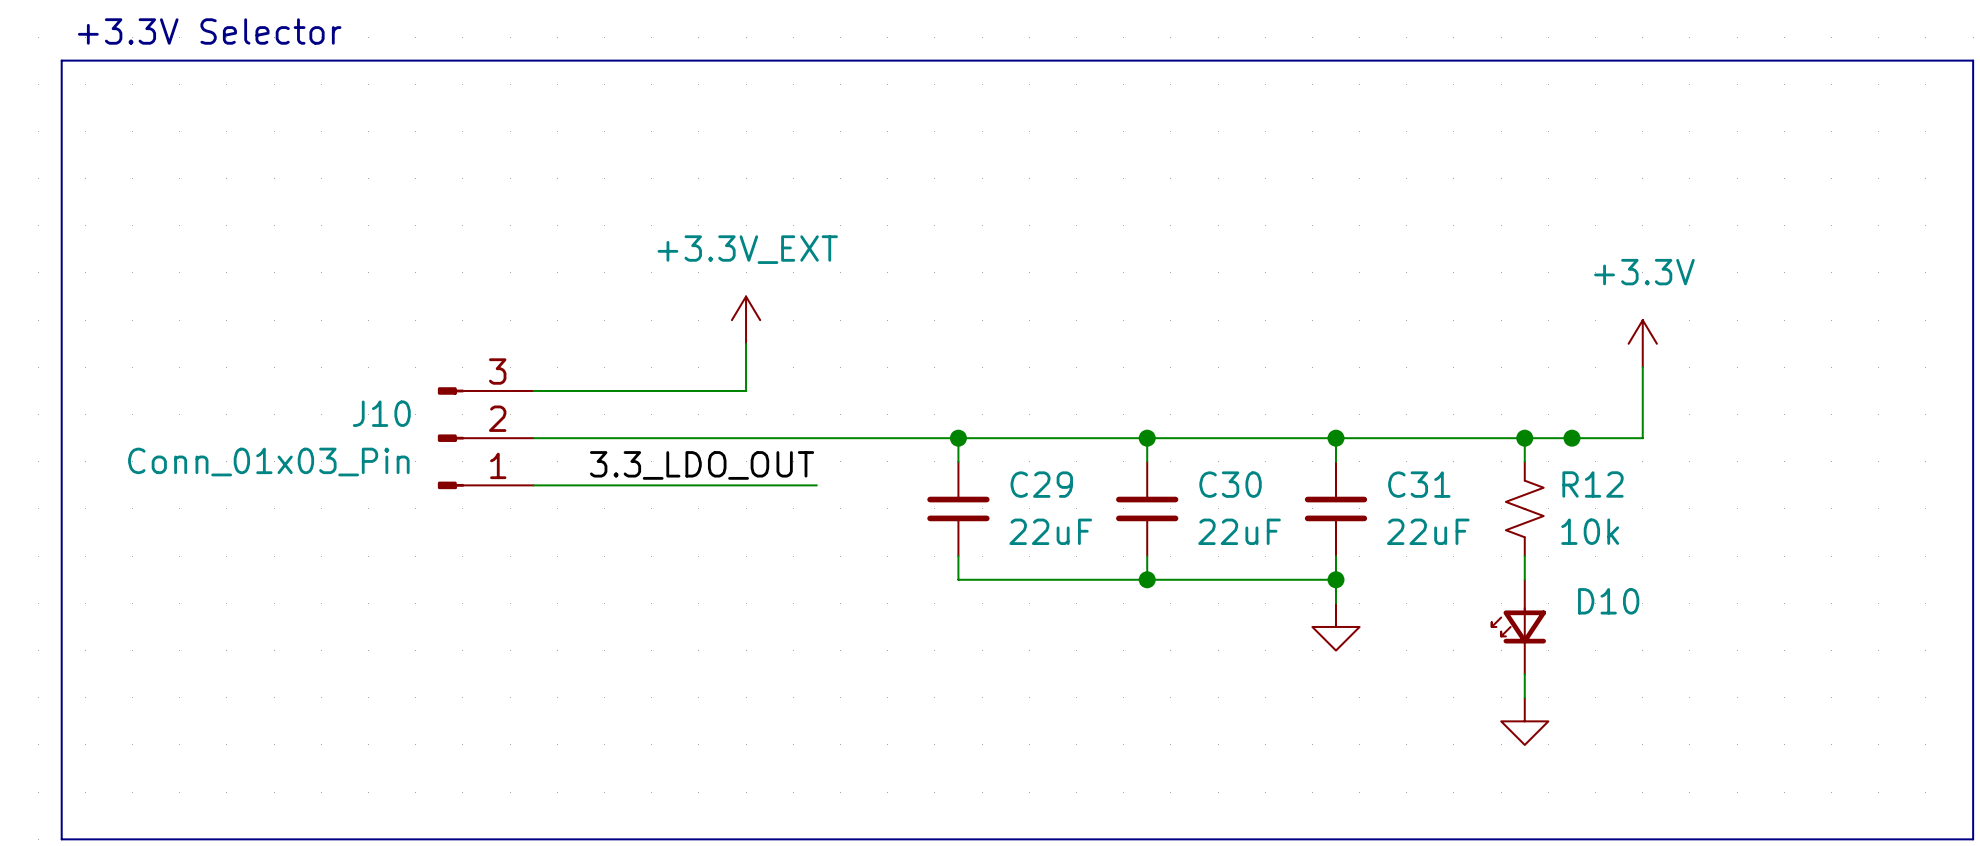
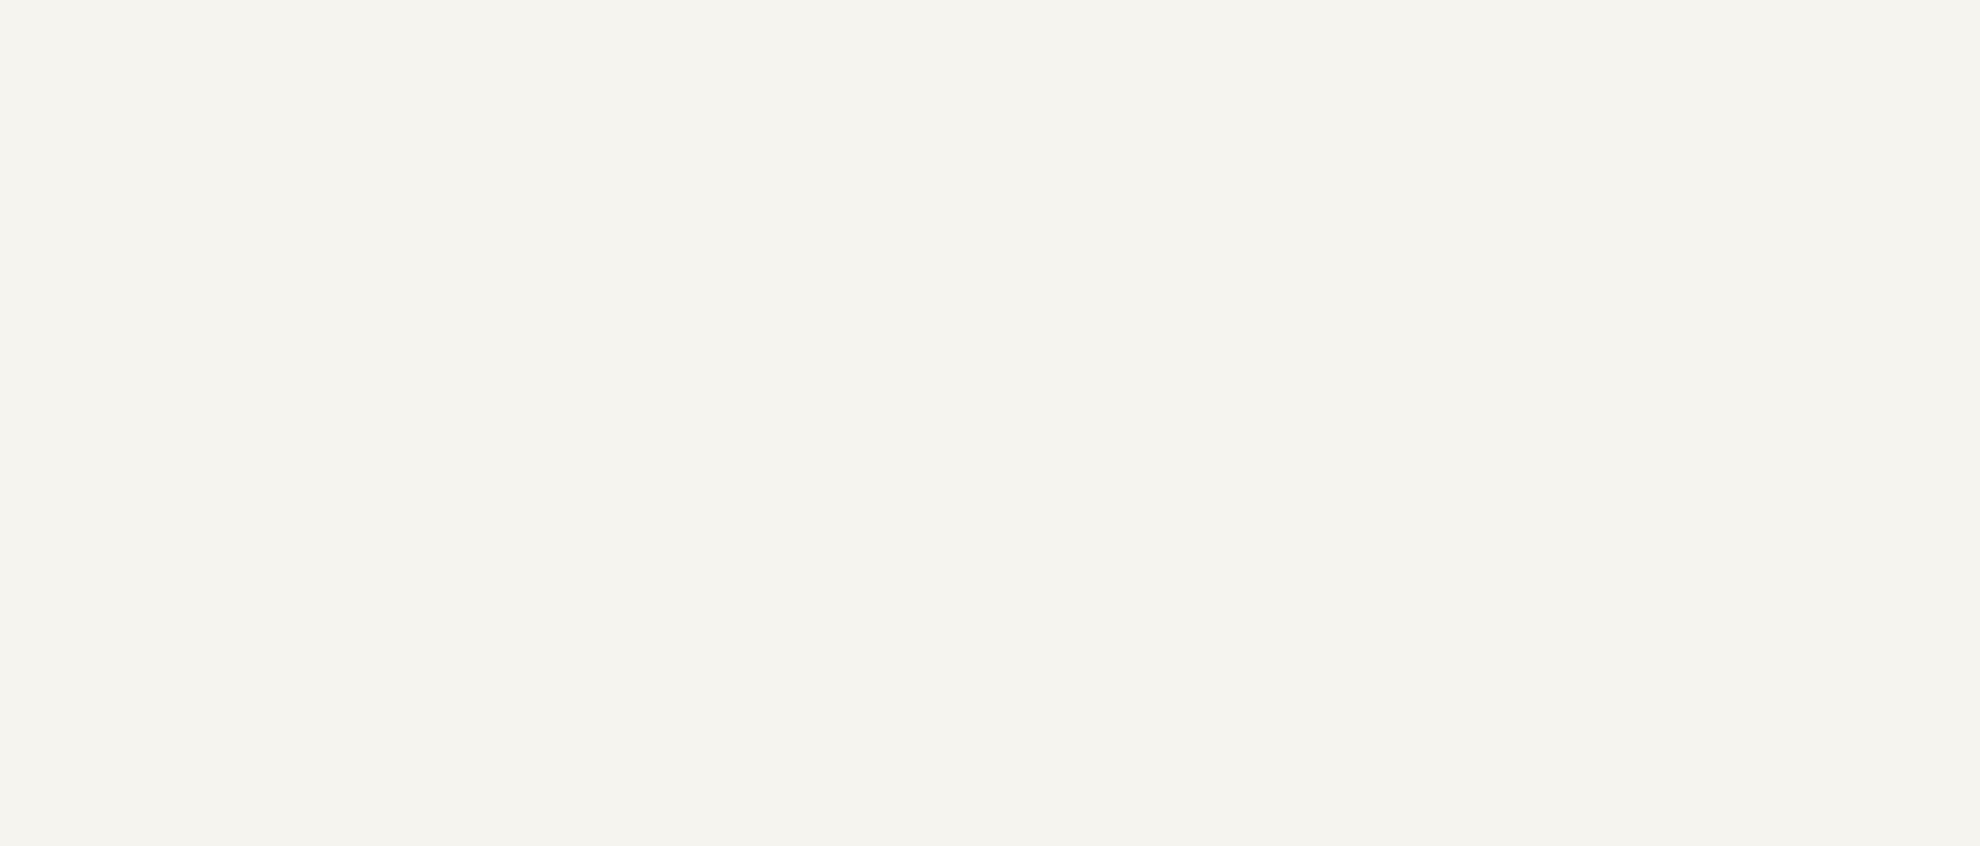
text: +3.3V Selector (209, 31) -> none
line: (61, 60) (1973, 60) (1973, 839) (61, 839) (61, 60) -> none
power symbol: +3.3V_EXT (746, 320) -> none
wire: (746, 343) (746, 390) (533, 390) -> none
power symbol: +3.3V (1642, 343) -> none
wire: (1642, 367) (1642, 438) (533, 438) -> none
J10: Conn_01x03_Pin (485, 438) -> none
wire: (958, 438) (958, 461) -> none
junction: (958, 438) -> none
wire: (1147, 438) (1147, 461) -> none
junction: (1147, 438) -> none
wire: (1335, 438) (1335, 461) -> none
junction: (1335, 438) -> none
wire: (1524, 438) (1524, 461) -> none
junction: (1524, 438) -> none
junction: (1571, 438) -> none
label: 3.3_LDO_OUT (702, 465) -> none
wire: (533, 485) (816, 485) -> none
C29: 22uF (958, 508) -> none
C30: 22uF (1147, 508) -> none
C31: 22uF (1335, 508) -> none
R12: 10k (1524, 508) -> none
wire: (958, 556) (958, 579) (1335, 579) -> none
wire: (1147, 556) (1147, 579) -> none
wire: (1335, 556) (1335, 603) -> none
wire: (1524, 556) (1524, 579) -> none
junction: (1147, 579) -> none
junction: (1335, 579) -> none
power symbol: (1335, 626) -> none
D10: (1518, 626) -> none
wire: (1524, 674) (1524, 697) -> none
power symbol: (1524, 721) -> none

